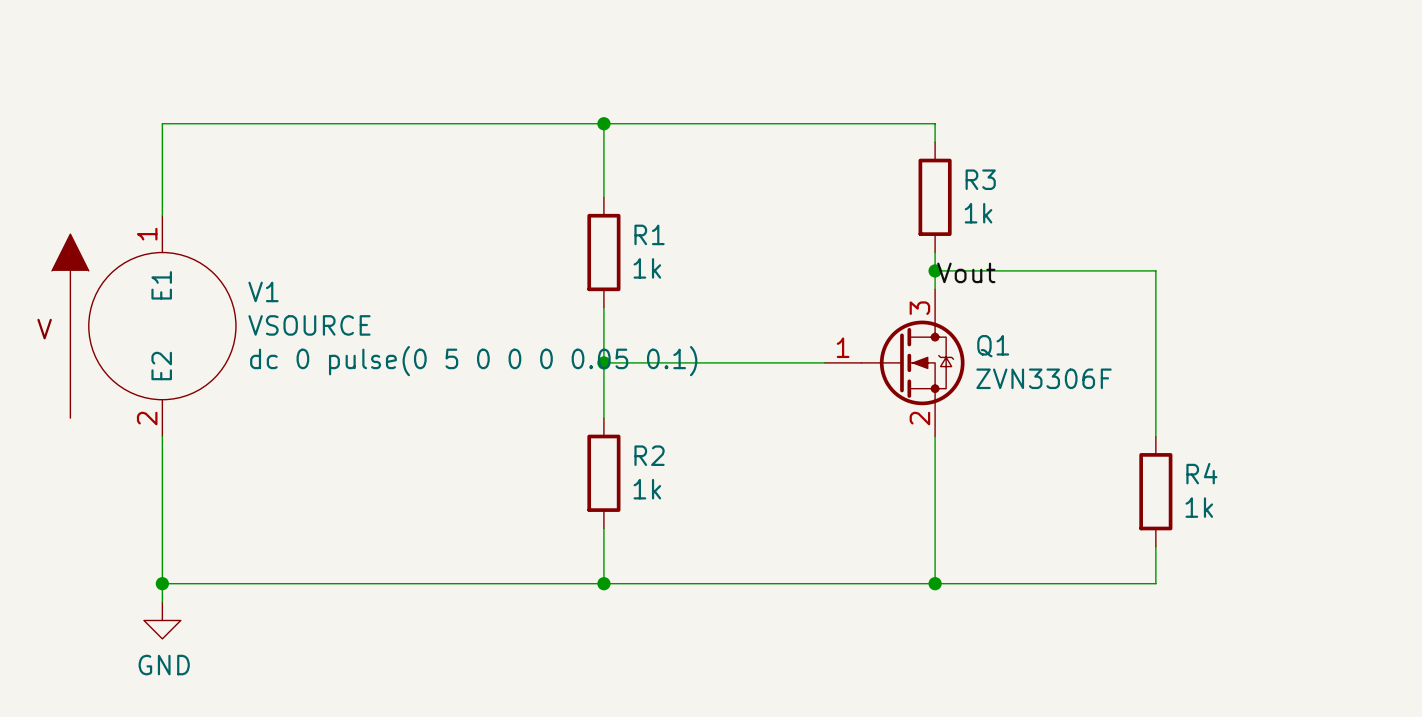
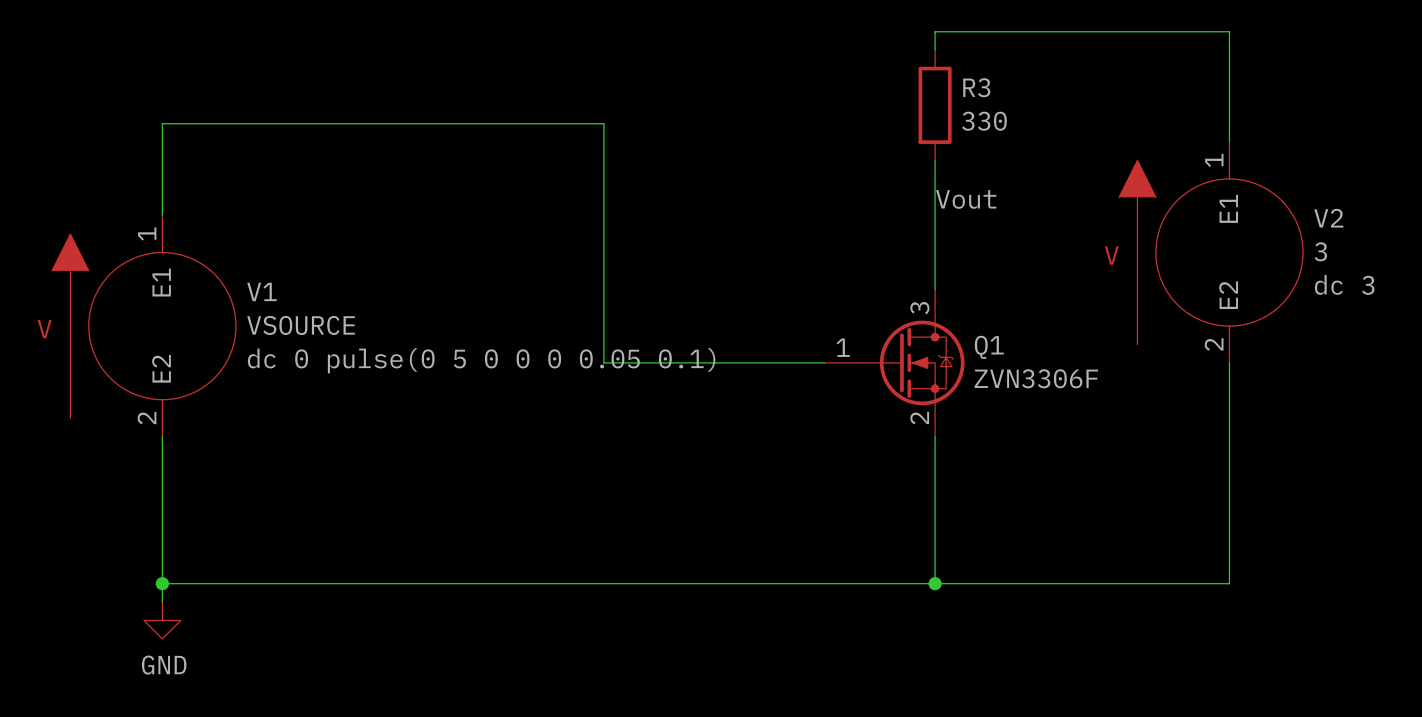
wire: none -> (935, 50) (935, 31) (1229, 31) (1229, 142)
wire: (603, 123) (935, 123) (935, 142) -> none
junction: (603, 123) -> none
wire: none -> (935, 160) (935, 252)
wire: none -> (603, 197) (603, 307)
R3 position: (935, 197) -> (935, 105)
R3 value: 1k (978, 213) -> 330 (984, 121)
R1: 1k (603, 252) -> none
V2: none -> 3 (1211, 252)
wire: (935, 270) (1155, 270) (1155, 436) -> none
junction: (935, 270) -> none
label position: Vout (966, 272) -> Vout (966, 199)
wire: (603, 362) (603, 418) -> none
junction: (603, 362) -> none
R2: 1k (603, 473) -> none
R4: 1k (1155, 491) -> none
wire: (603, 528) (603, 583) -> none
wire: (1155, 546) (1155, 583) -> (1229, 362) (1229, 583) (1155, 583)
junction: (603, 583) -> none

